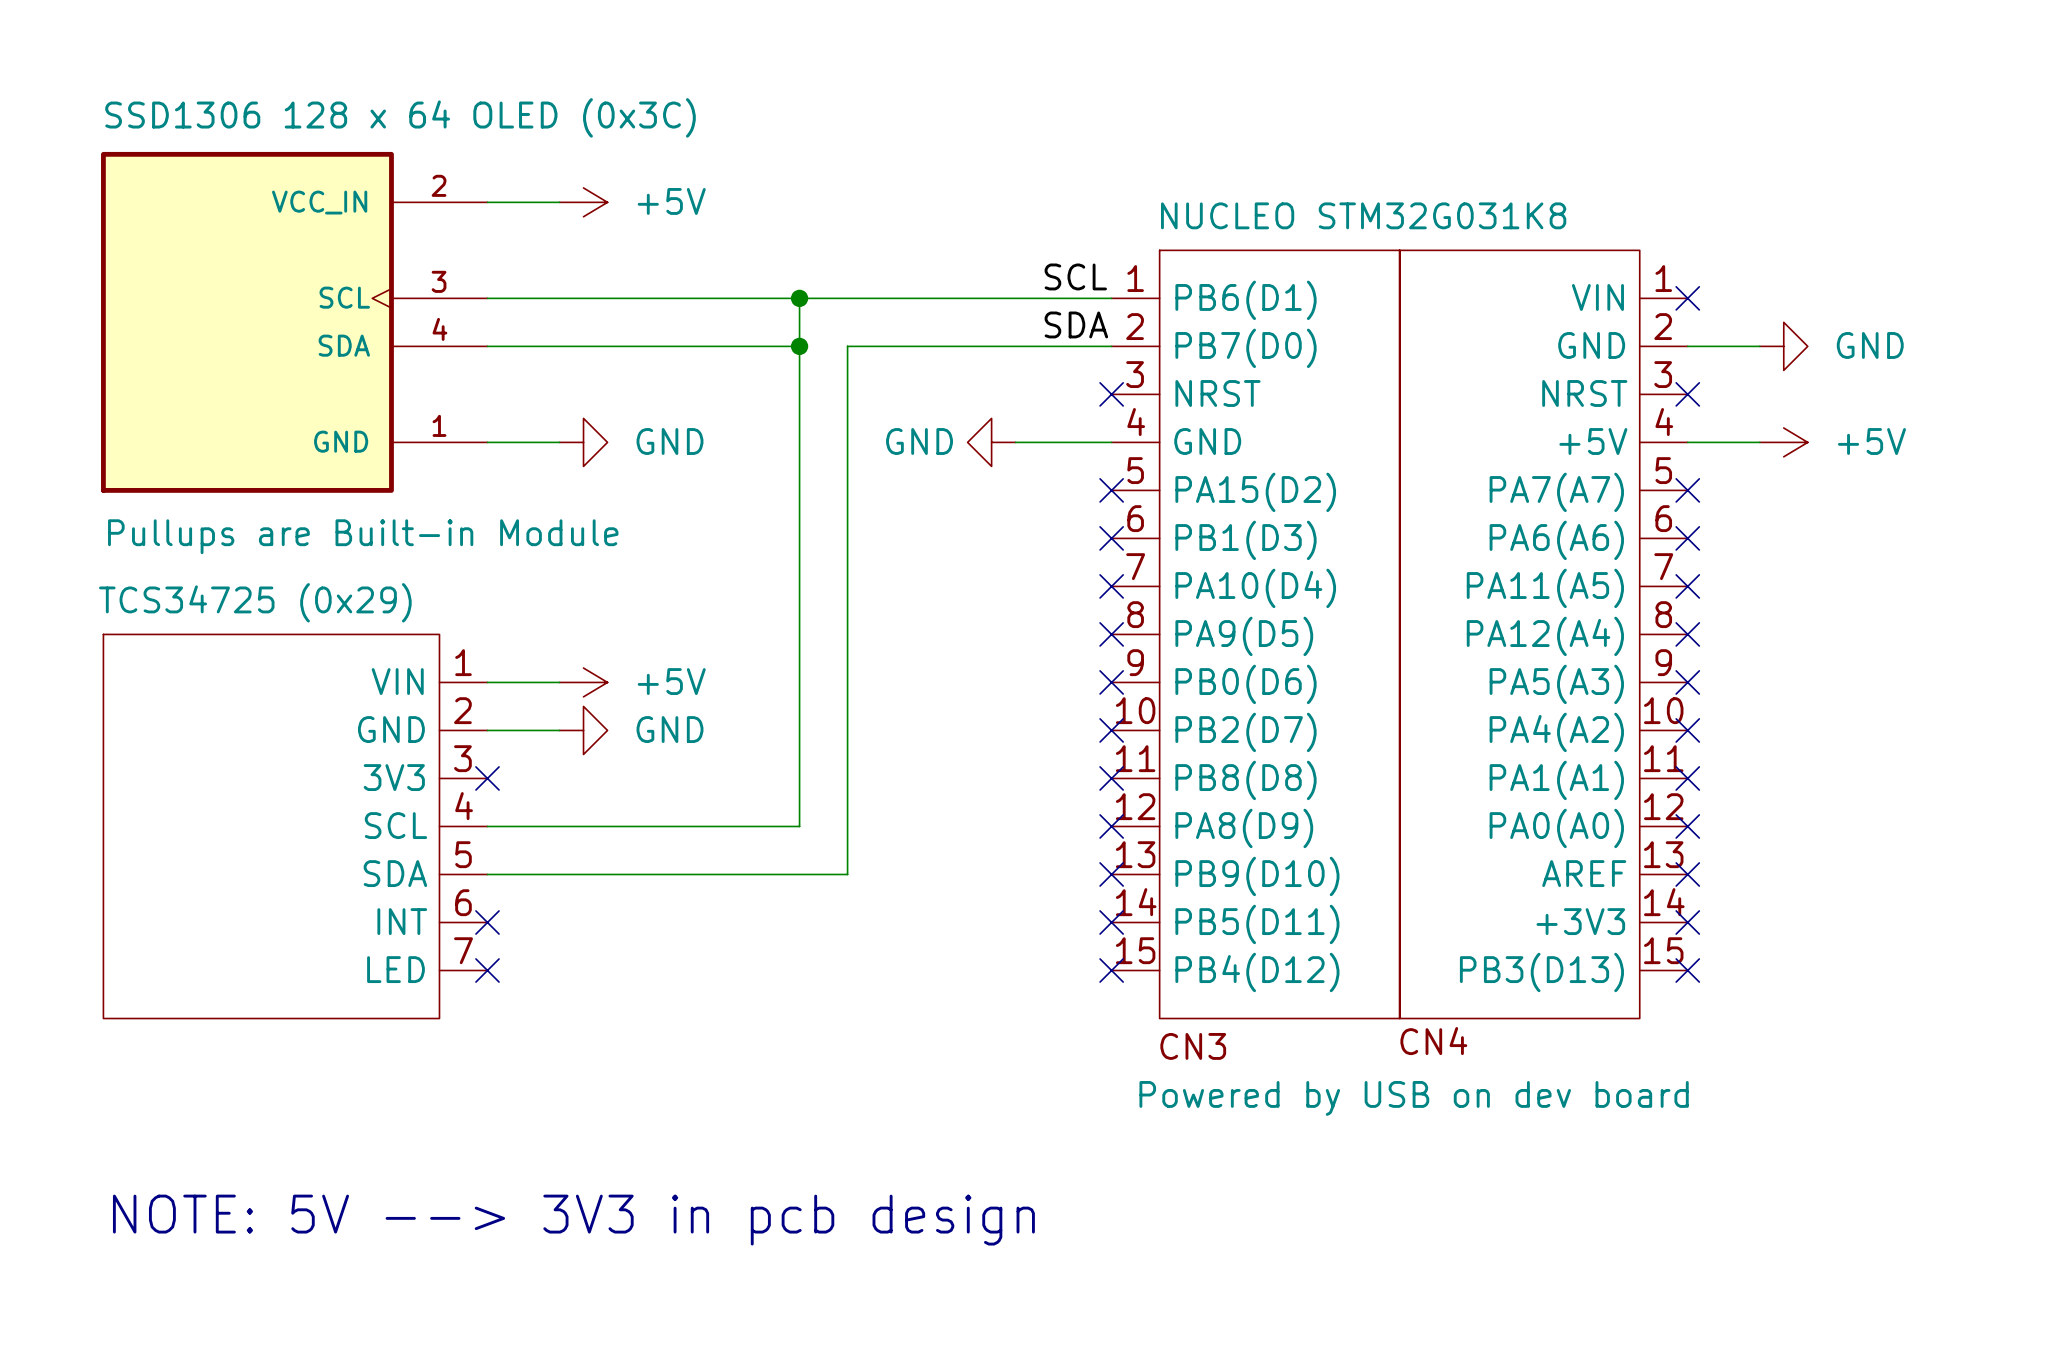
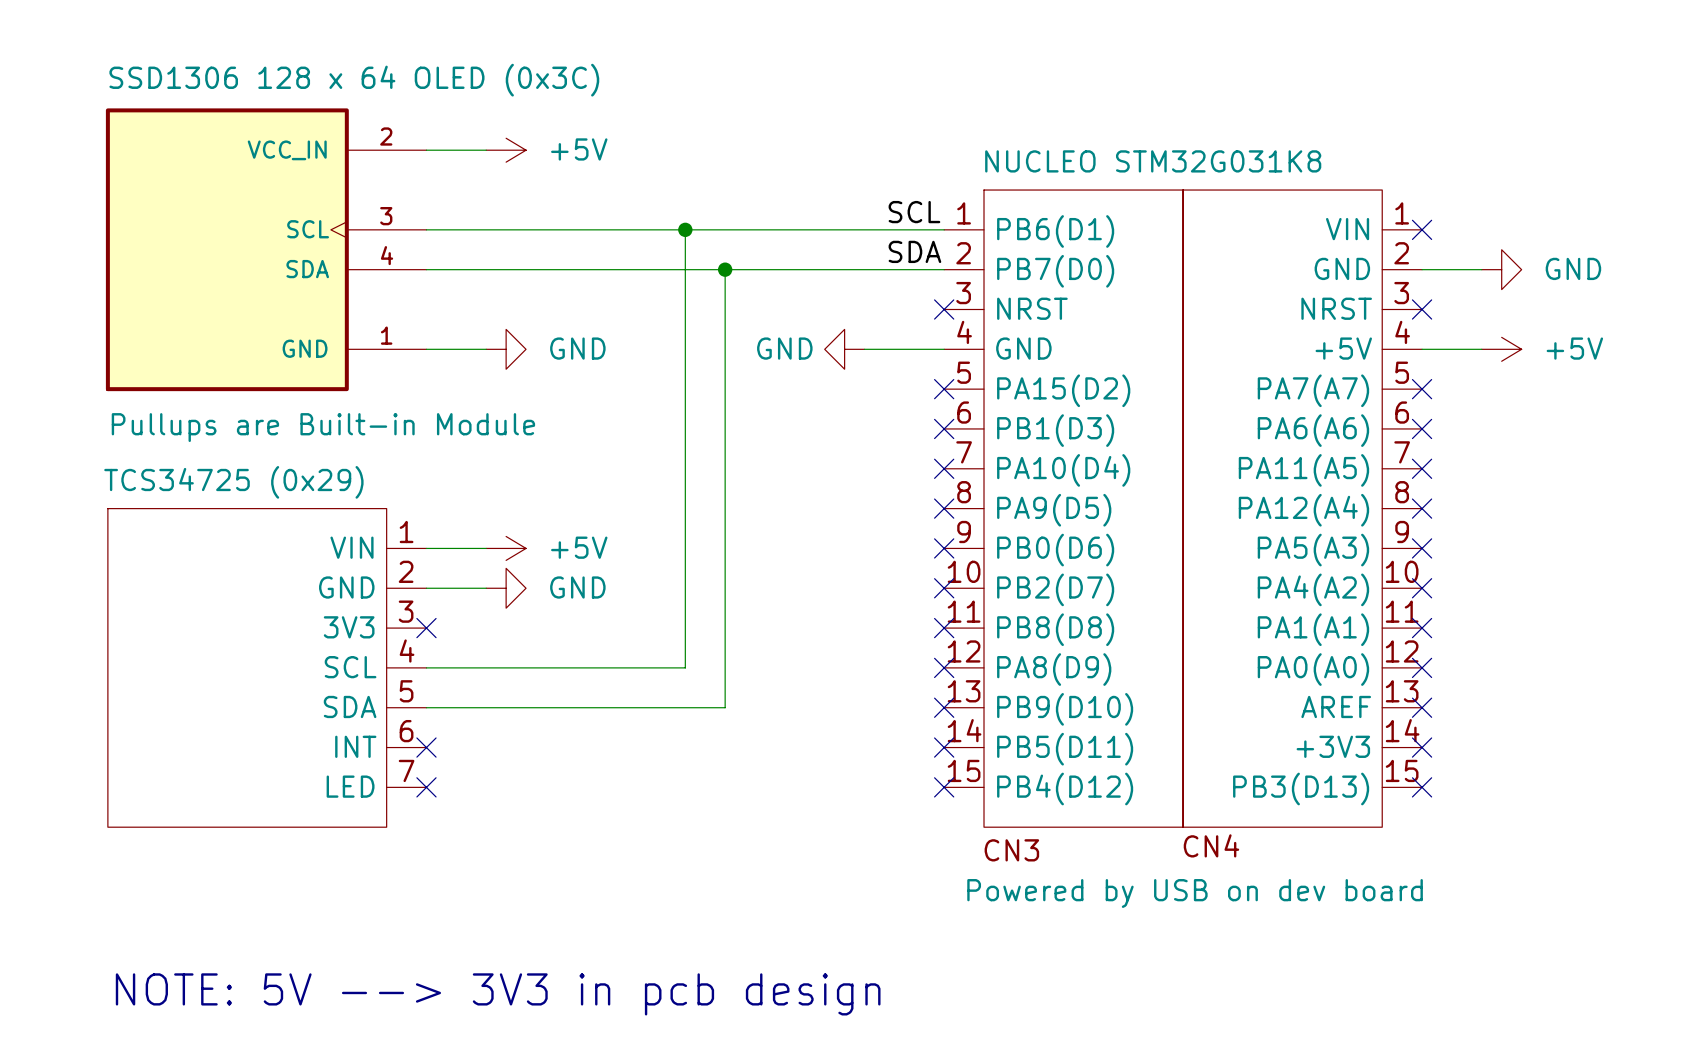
wire: none -> (685, 269) (725, 269)
junction position: (799, 346) -> (725, 269)

